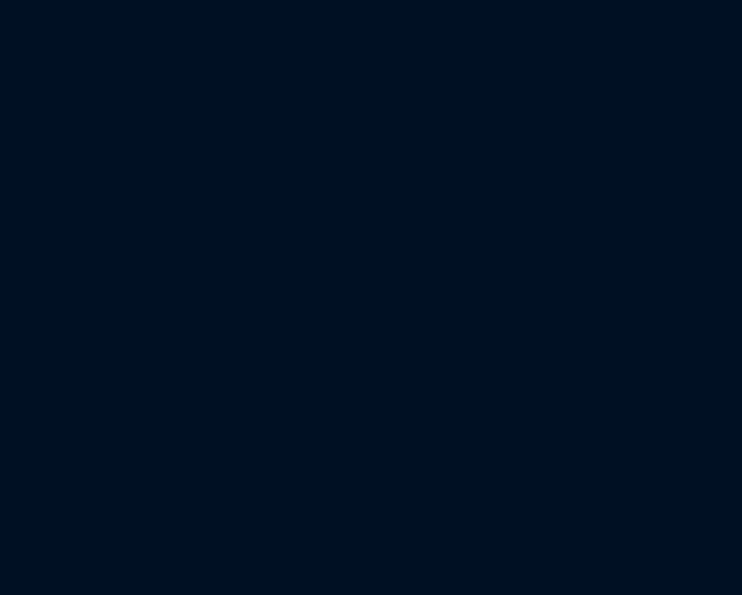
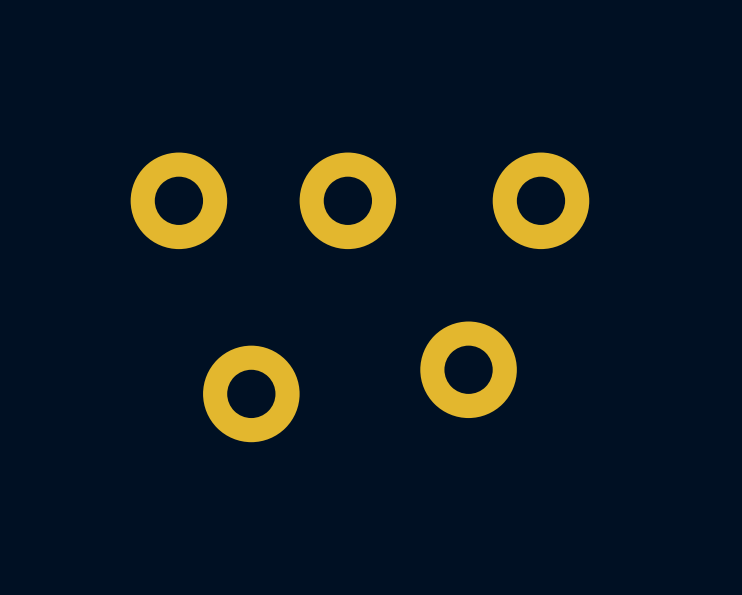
part: none -> (178, 200)
part: none -> (347, 200)
part: none -> (540, 200)
part: none -> (468, 369)
part: none -> (251, 393)

